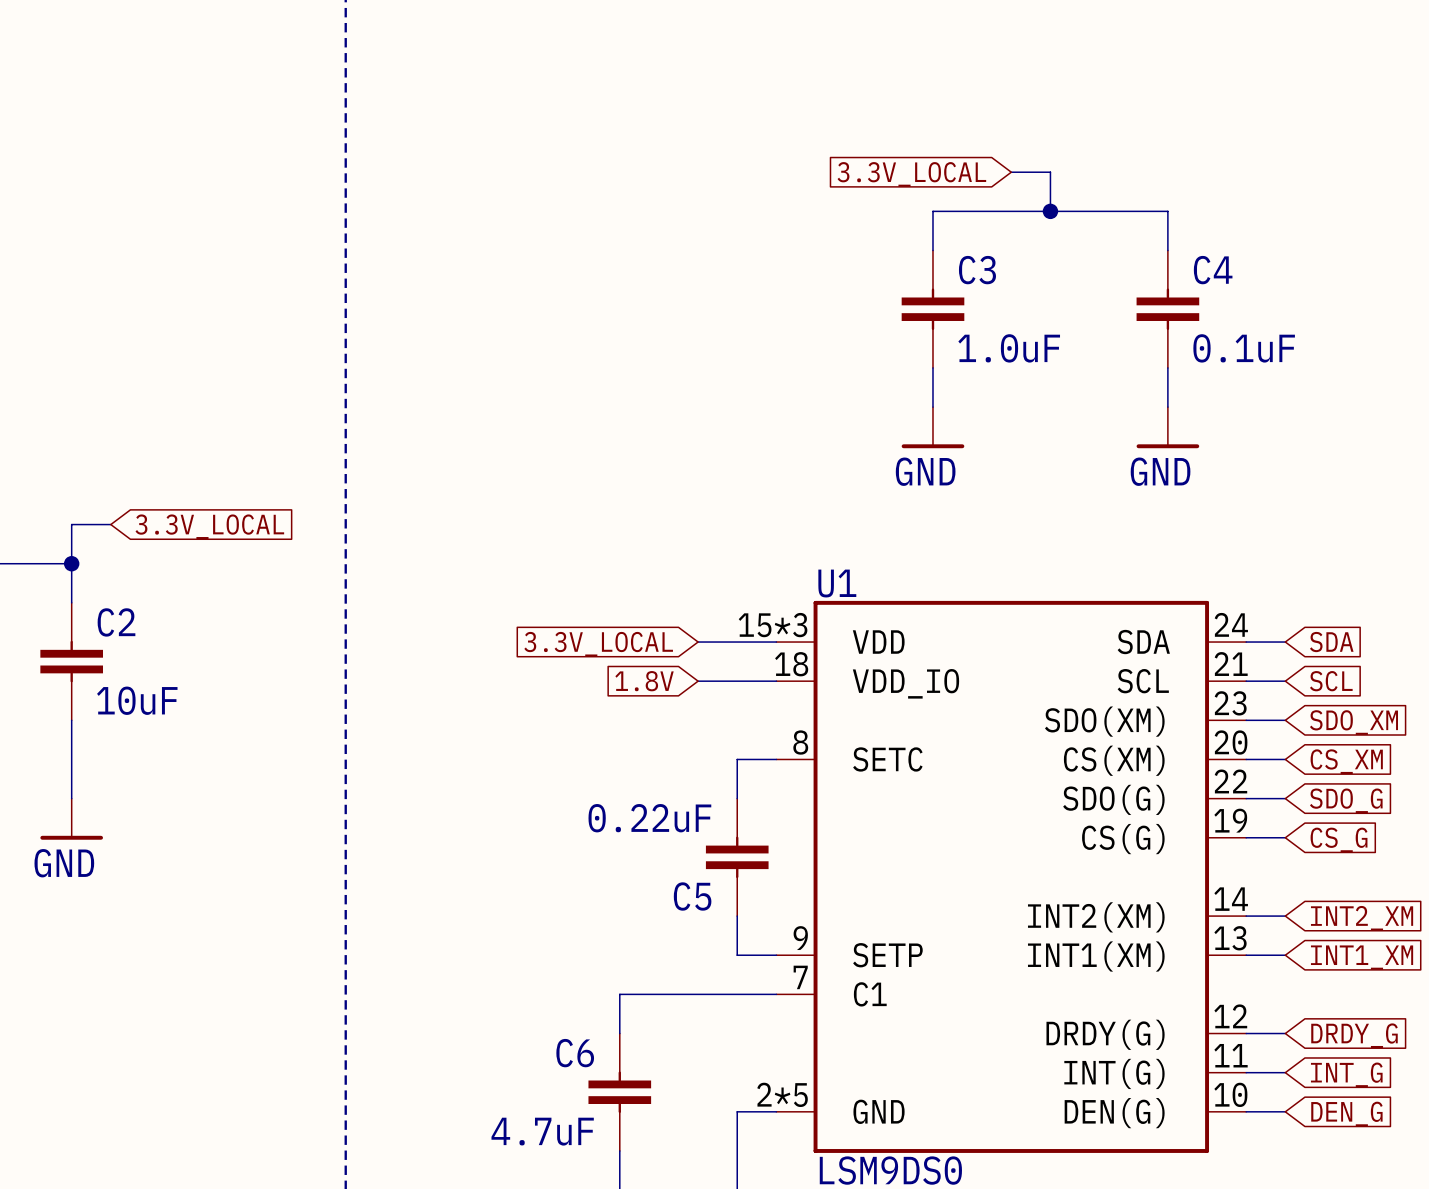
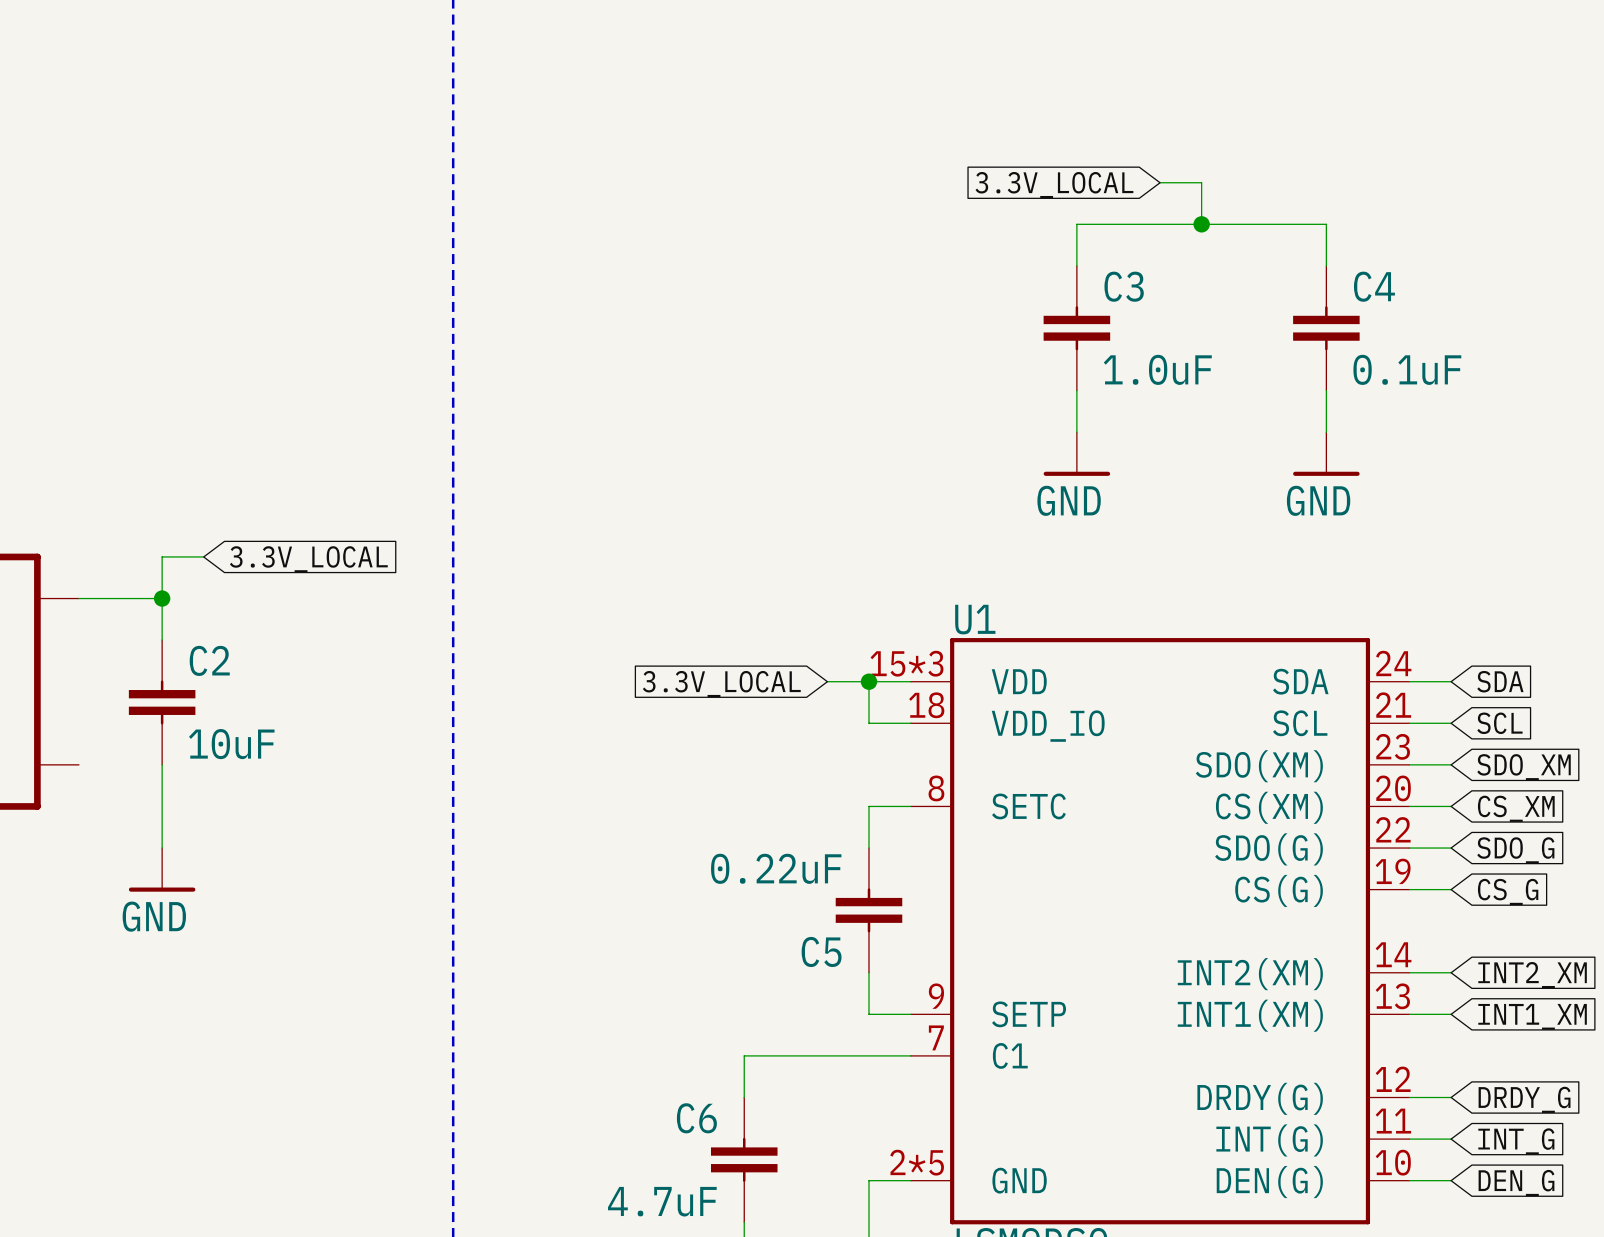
junction: none -> (868, 681)
global label: 1.8V (644, 681) -> none
wire: (698, 681) (737, 681) -> (868, 681) (868, 723)

